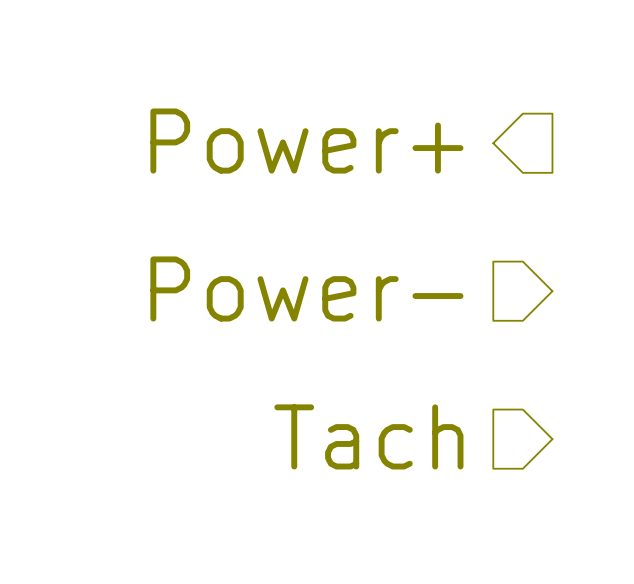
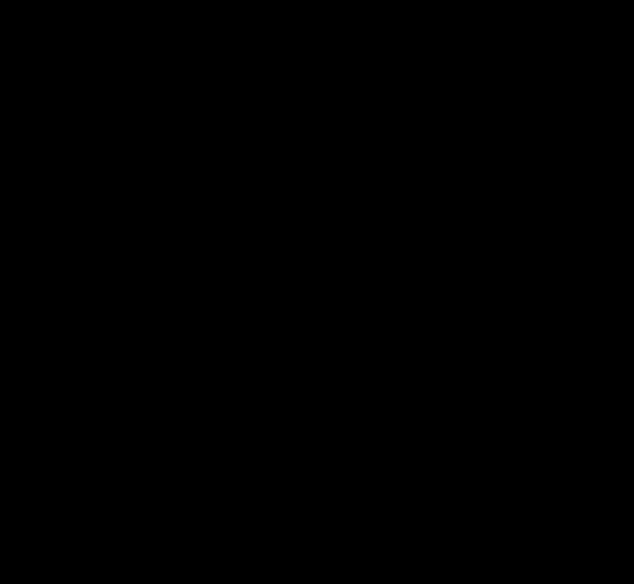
hierarchical label: Power+ (306, 141) -> none
hierarchical label: Power- (306, 288) -> none
hierarchical label: Tach (368, 436) -> none

